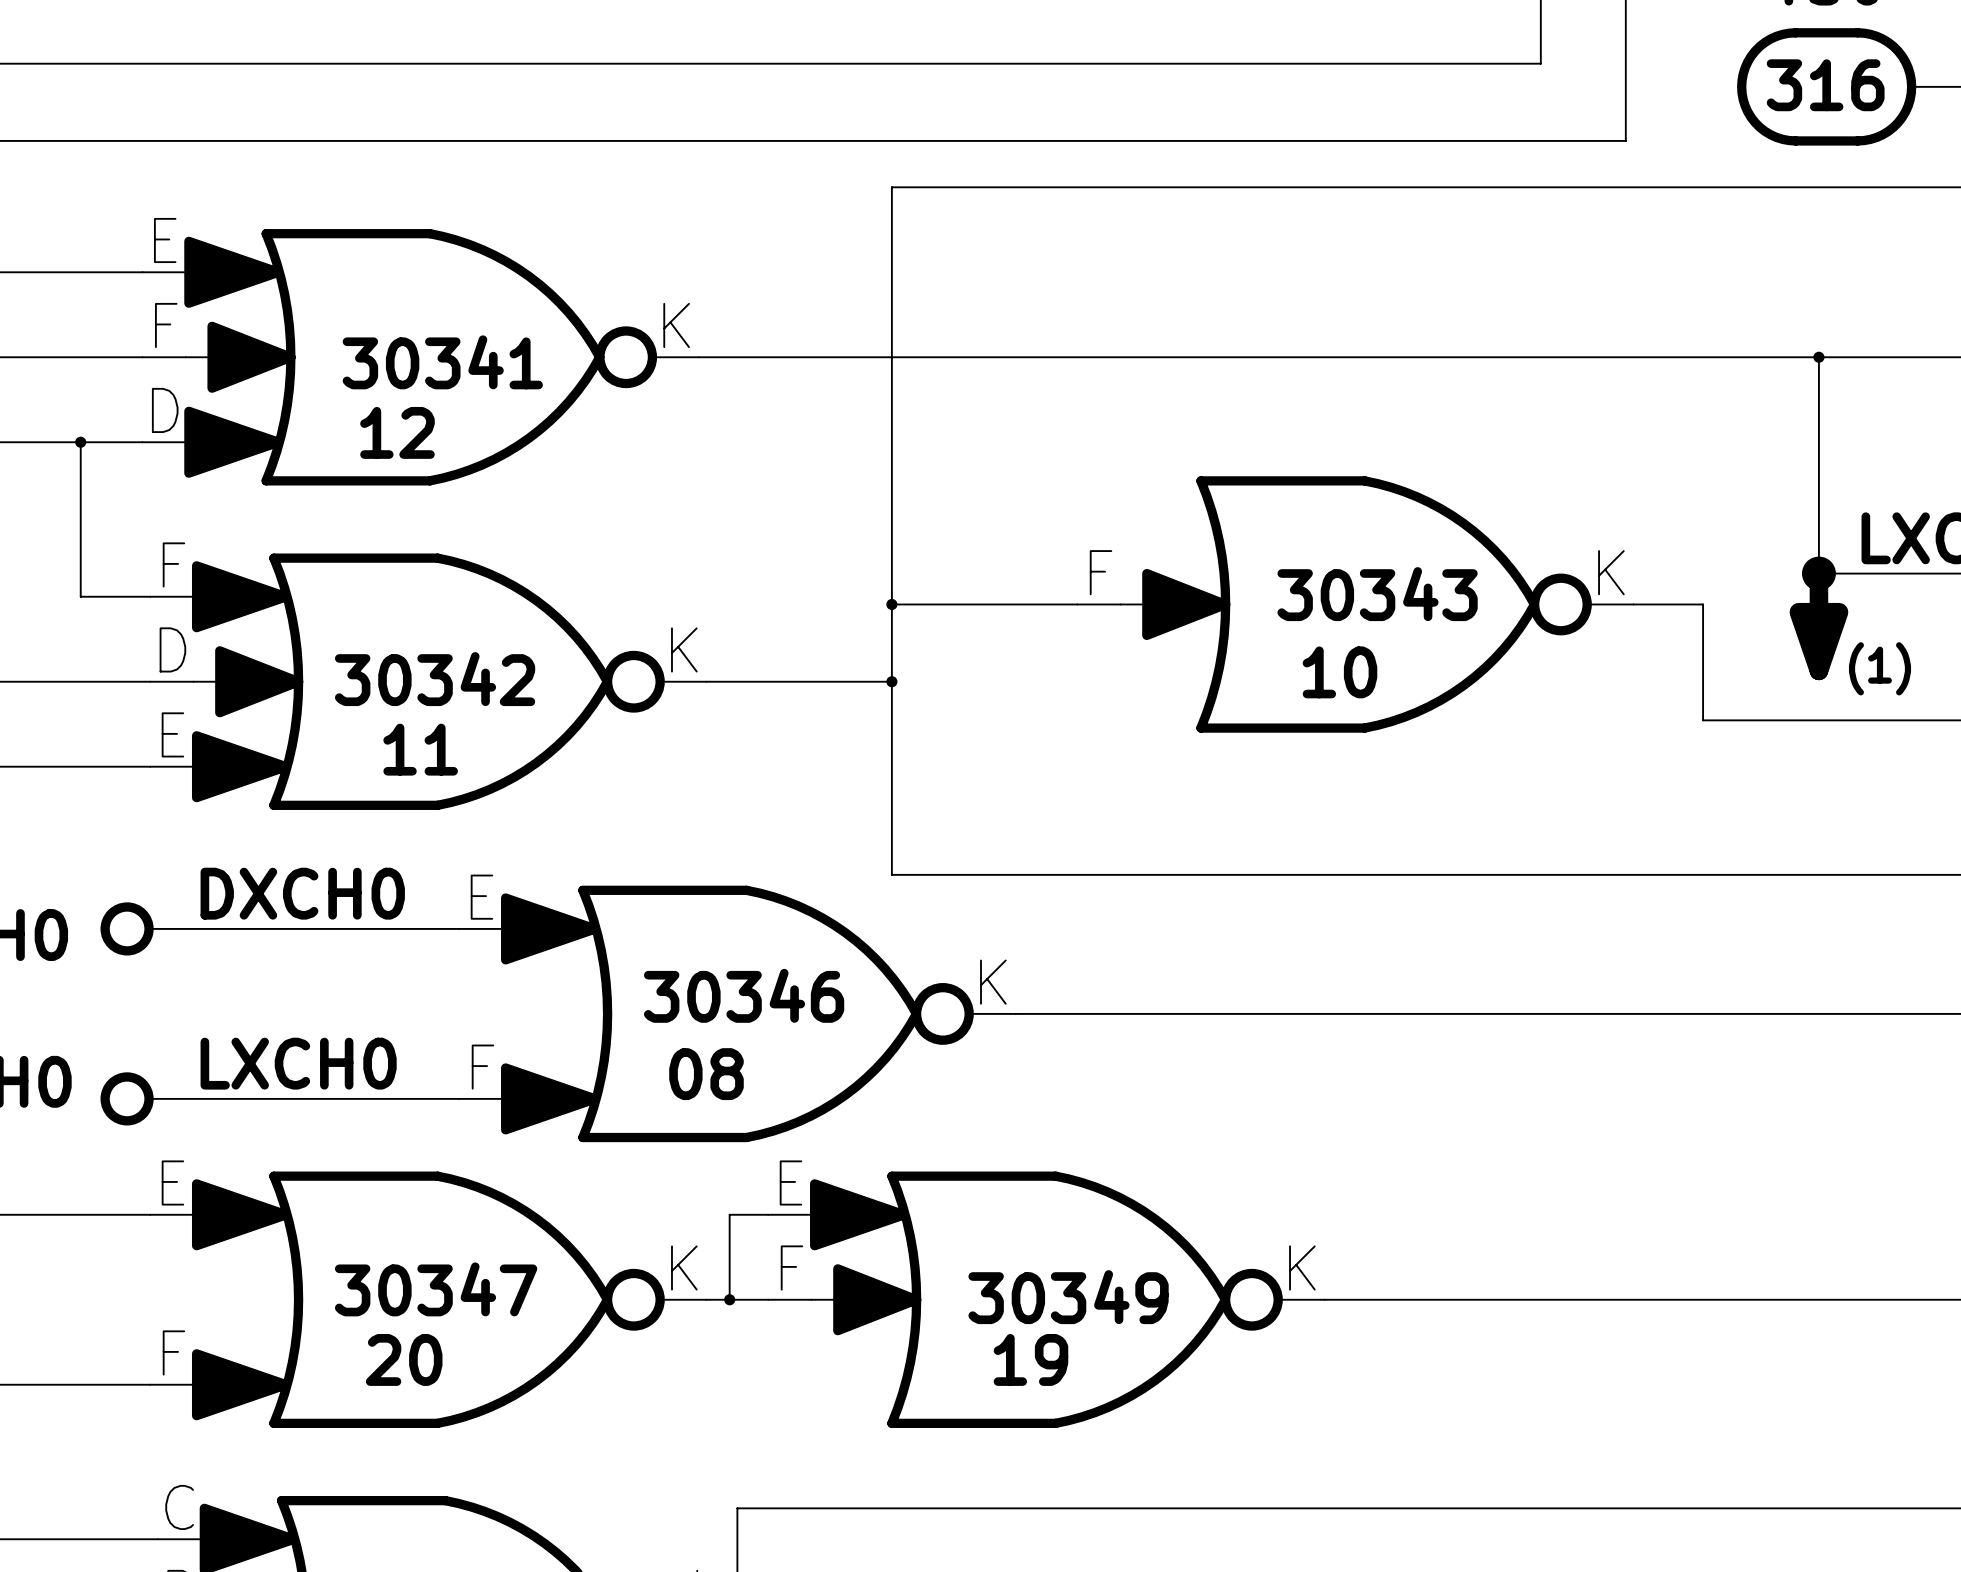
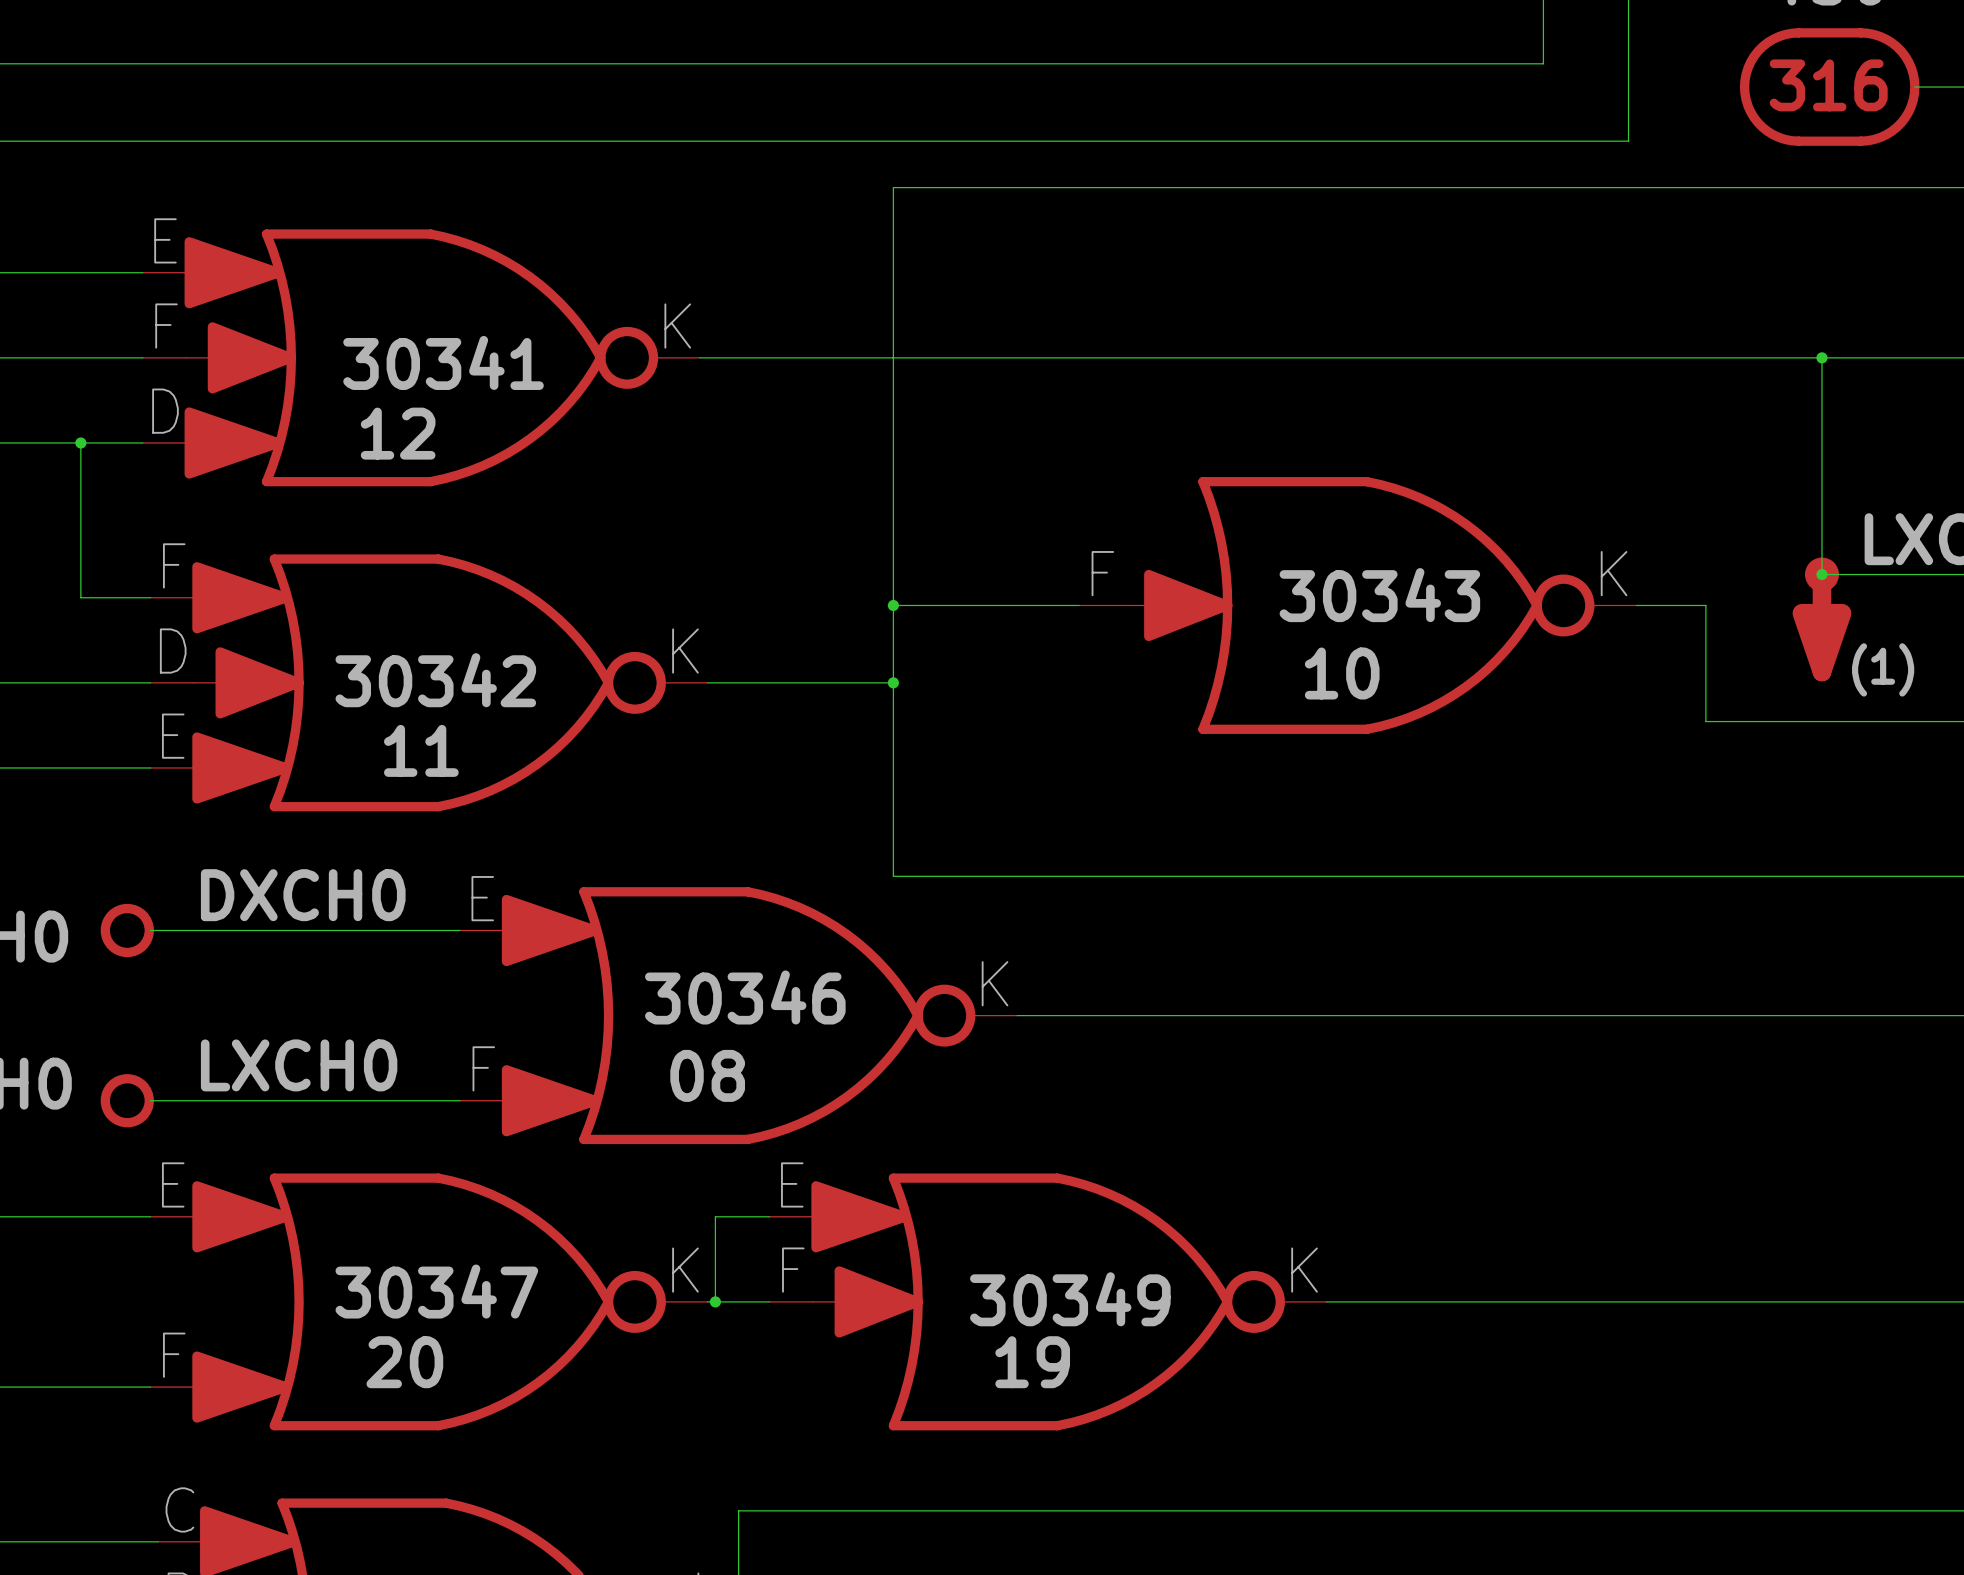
wire: (729, 1214) (729, 1299) -> (730, 1216) (715, 1216) (715, 1301)
junction position: (729, 1299) -> (715, 1301)

